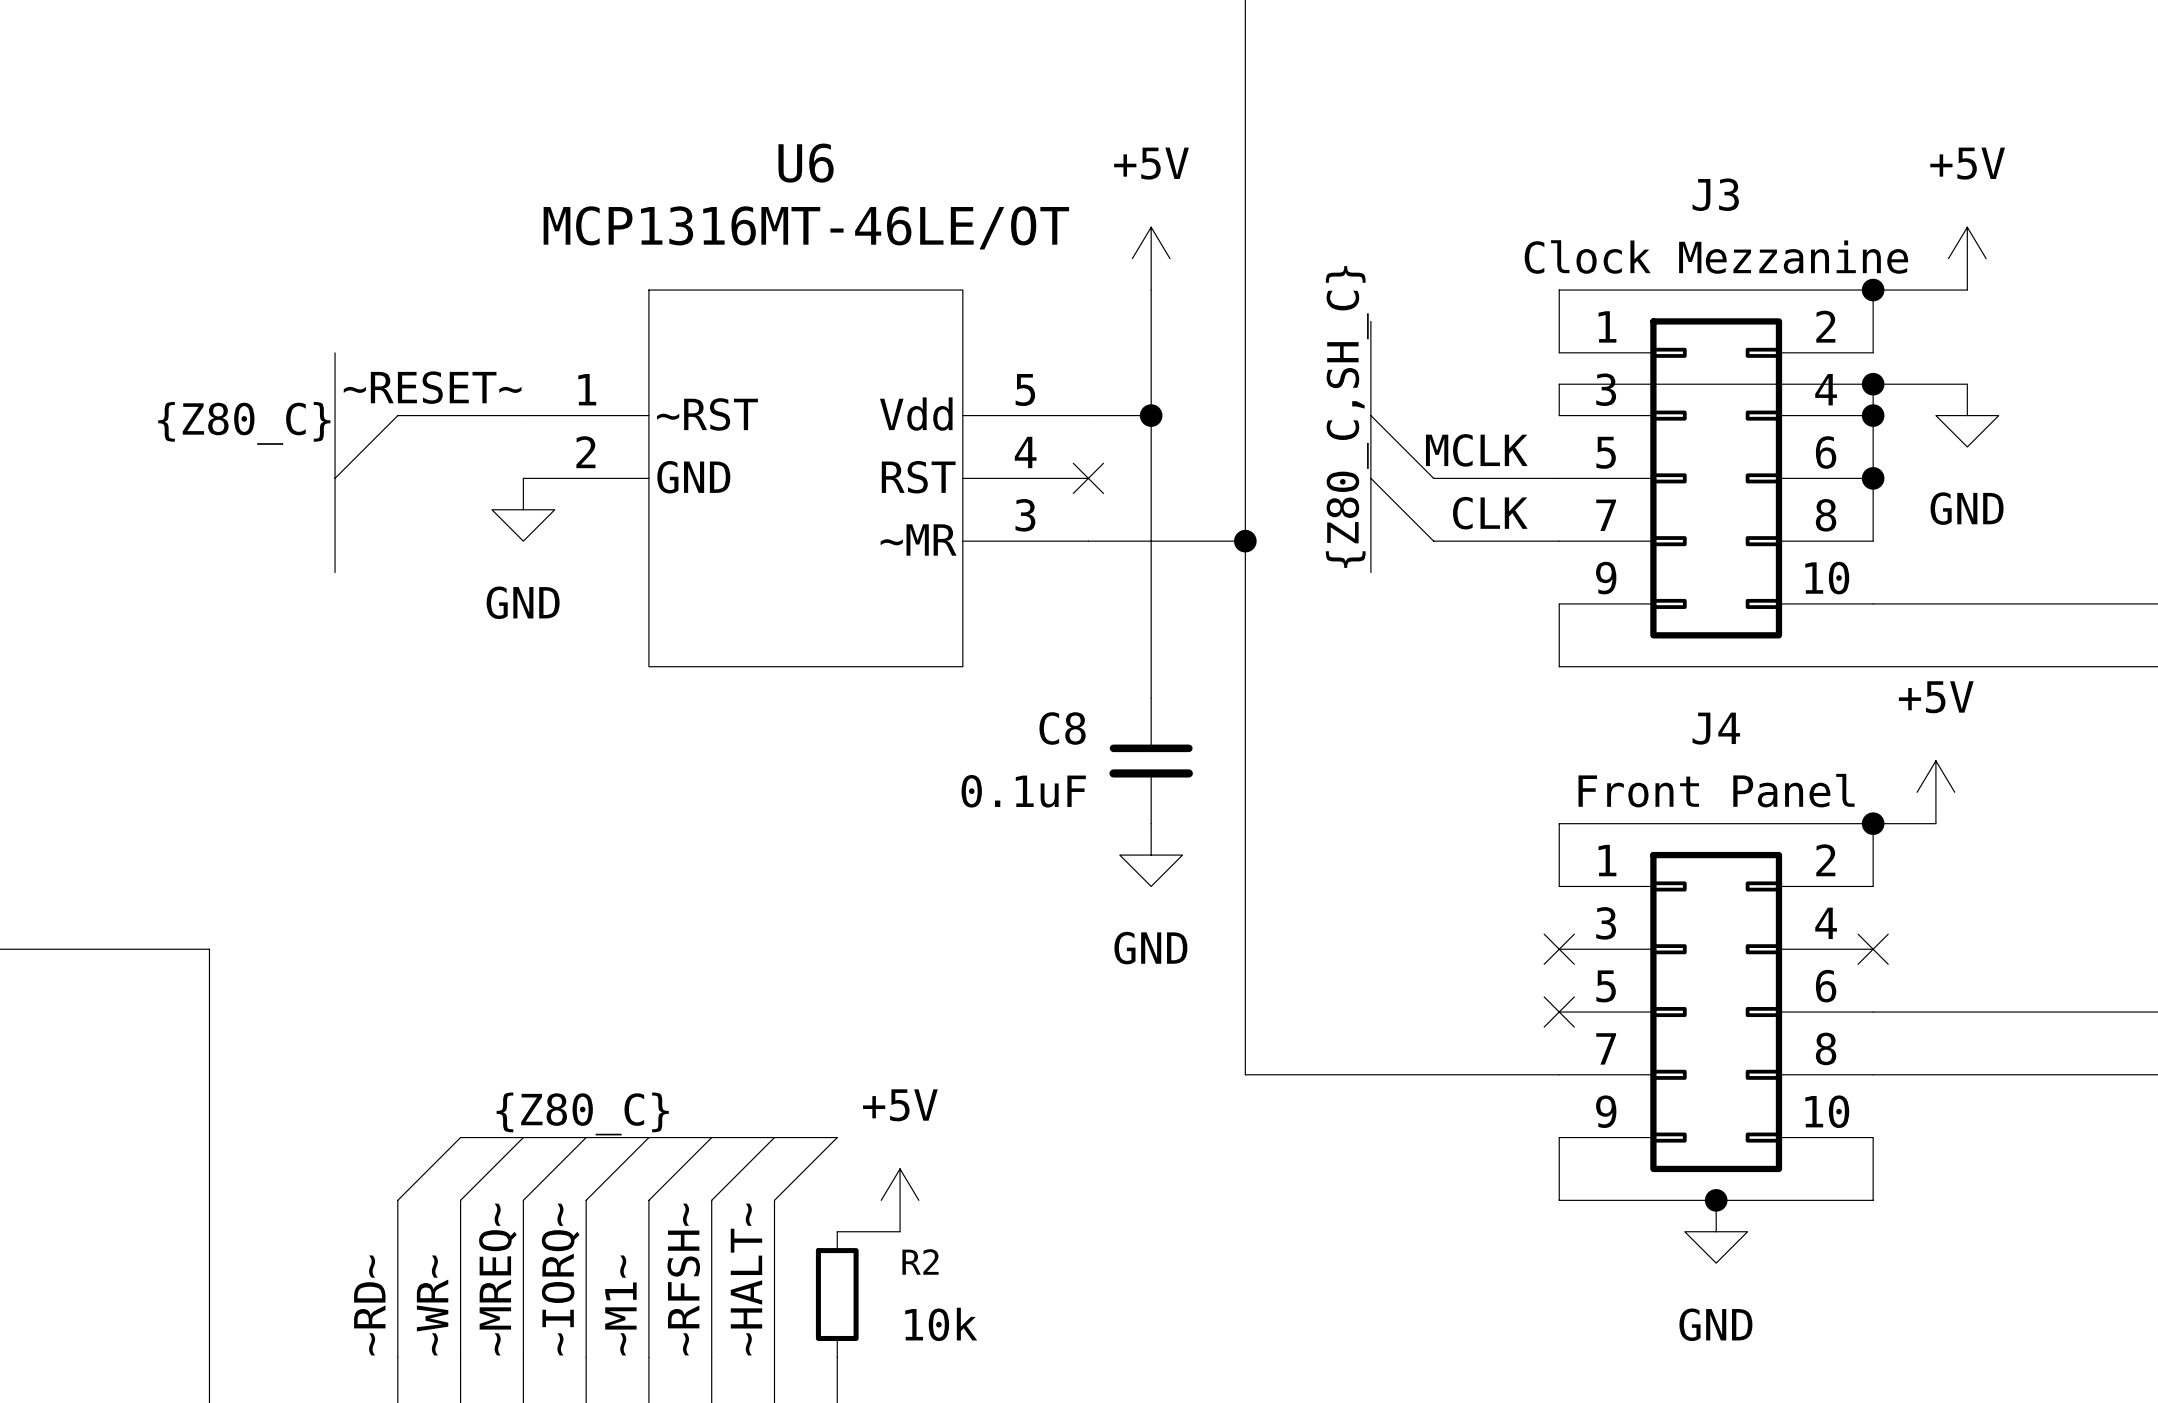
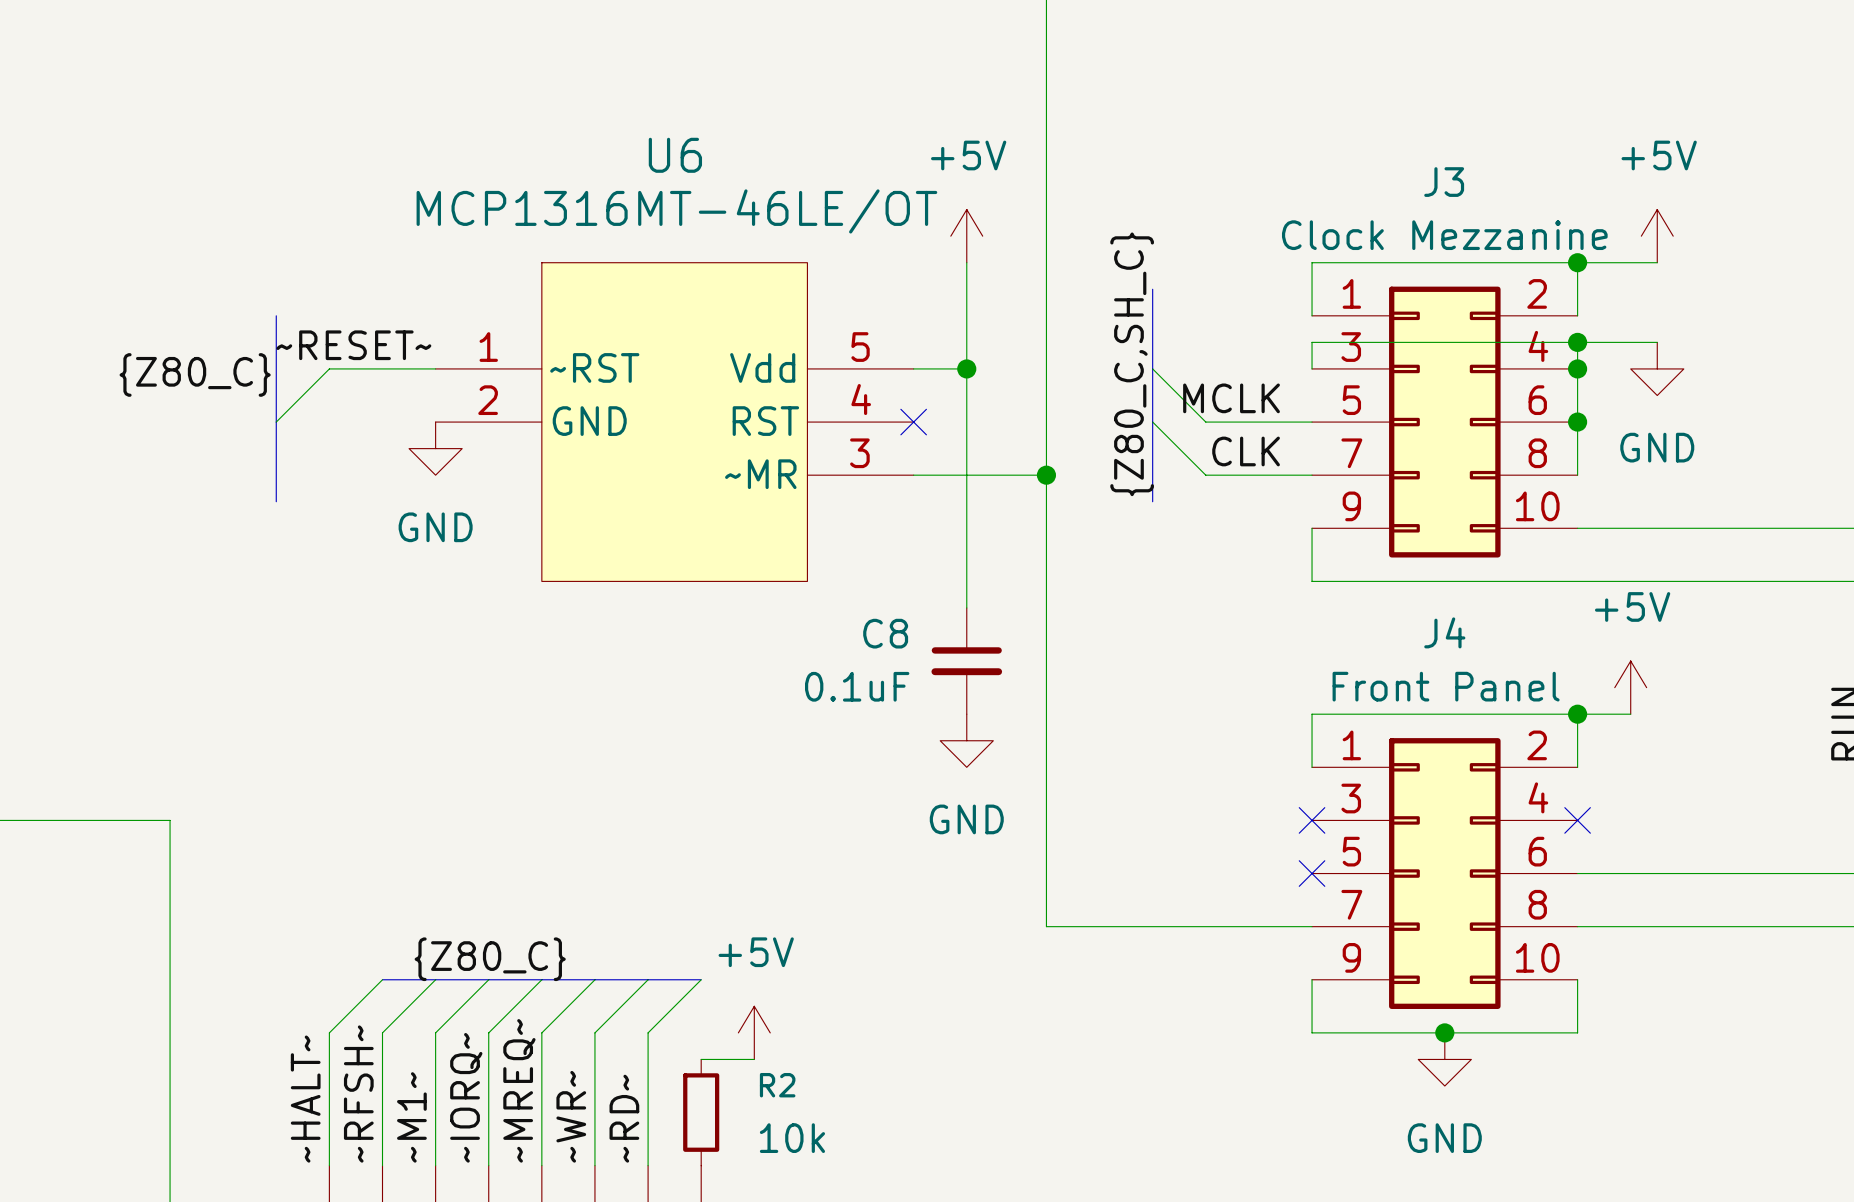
label: ~MREQ~ (497, 1279) -> ~M1~ (411, 1117)
label: ~RFSH~ (683, 1279) -> ~WR~ (571, 1116)
label: ~HALT~ (746, 1279) -> ~RD~ (624, 1118)
label: ~RD~ (369, 1305) -> ~HALT~ (305, 1099)
label: ~WR~ (432, 1305) -> ~RFSH~ (358, 1094)
label: ~M1~ (620, 1305) -> ~MREQ~ (519, 1090)

